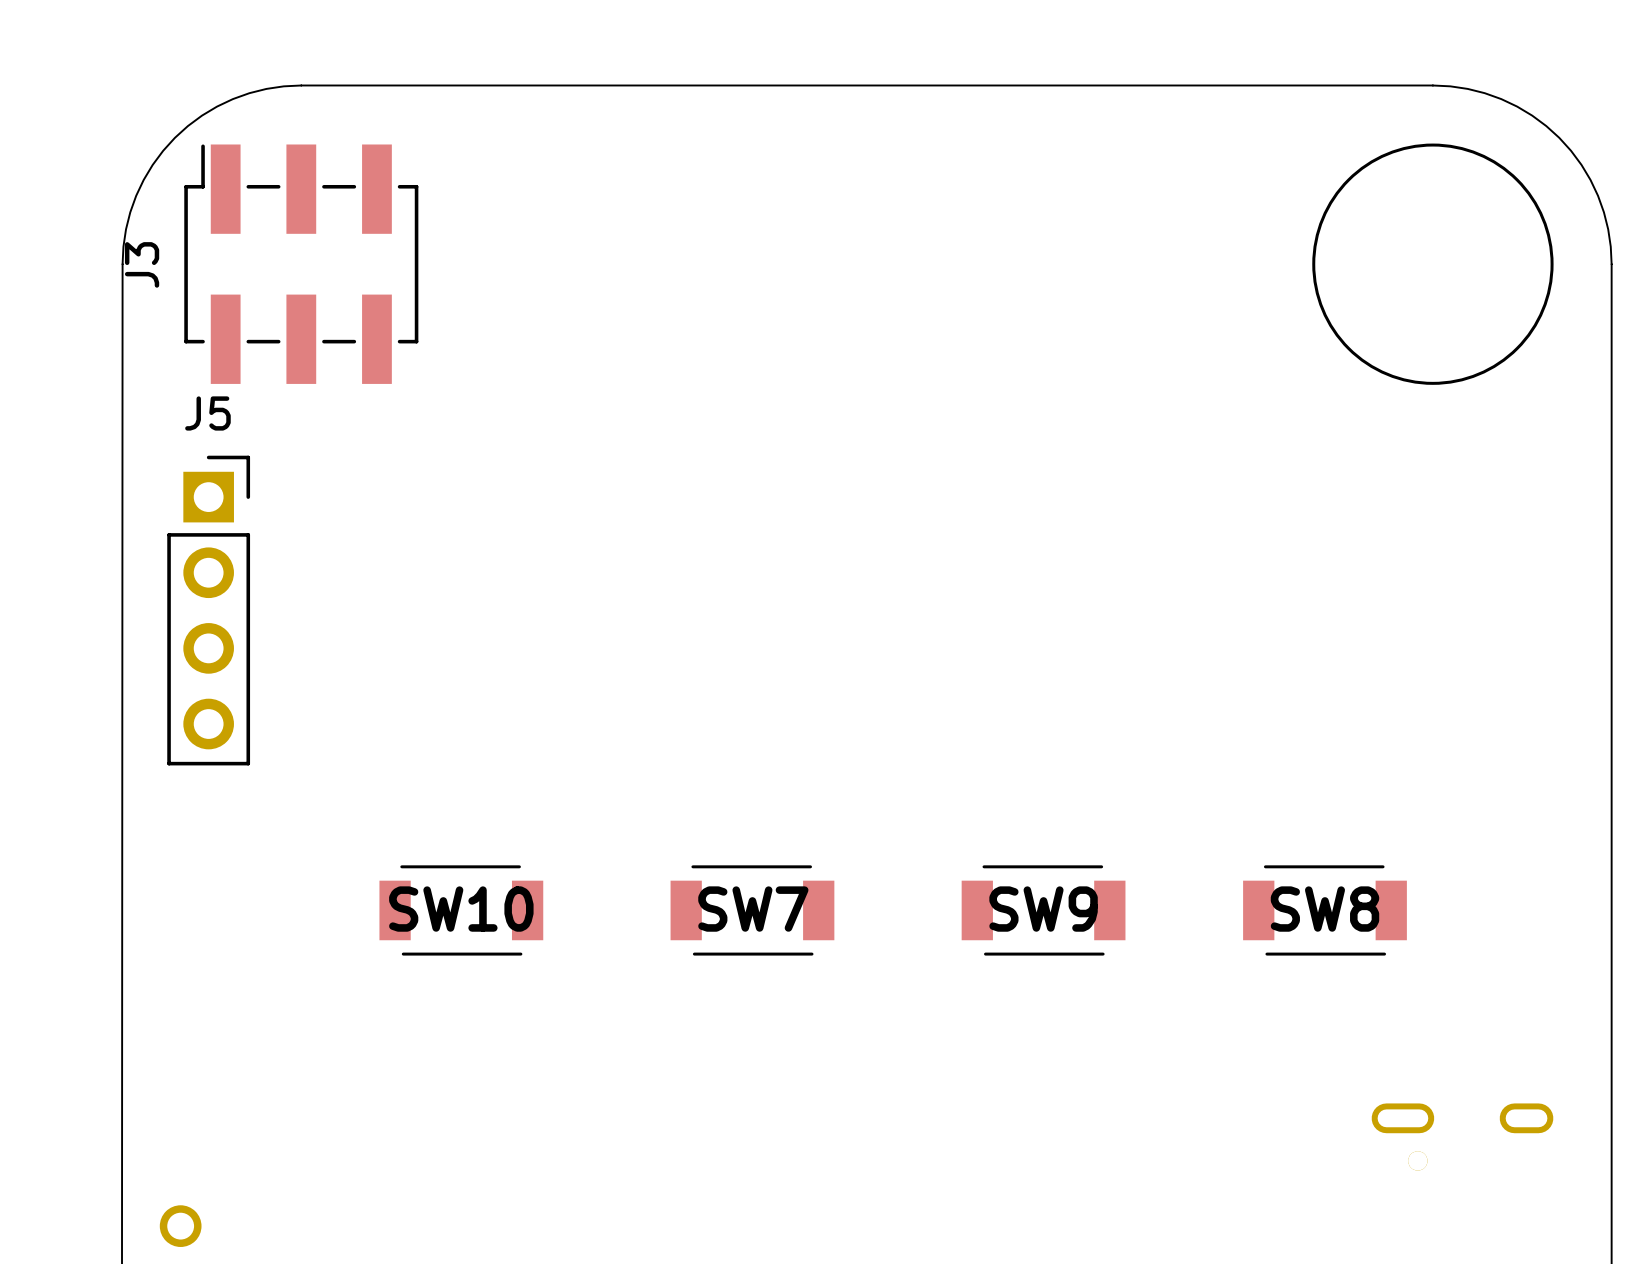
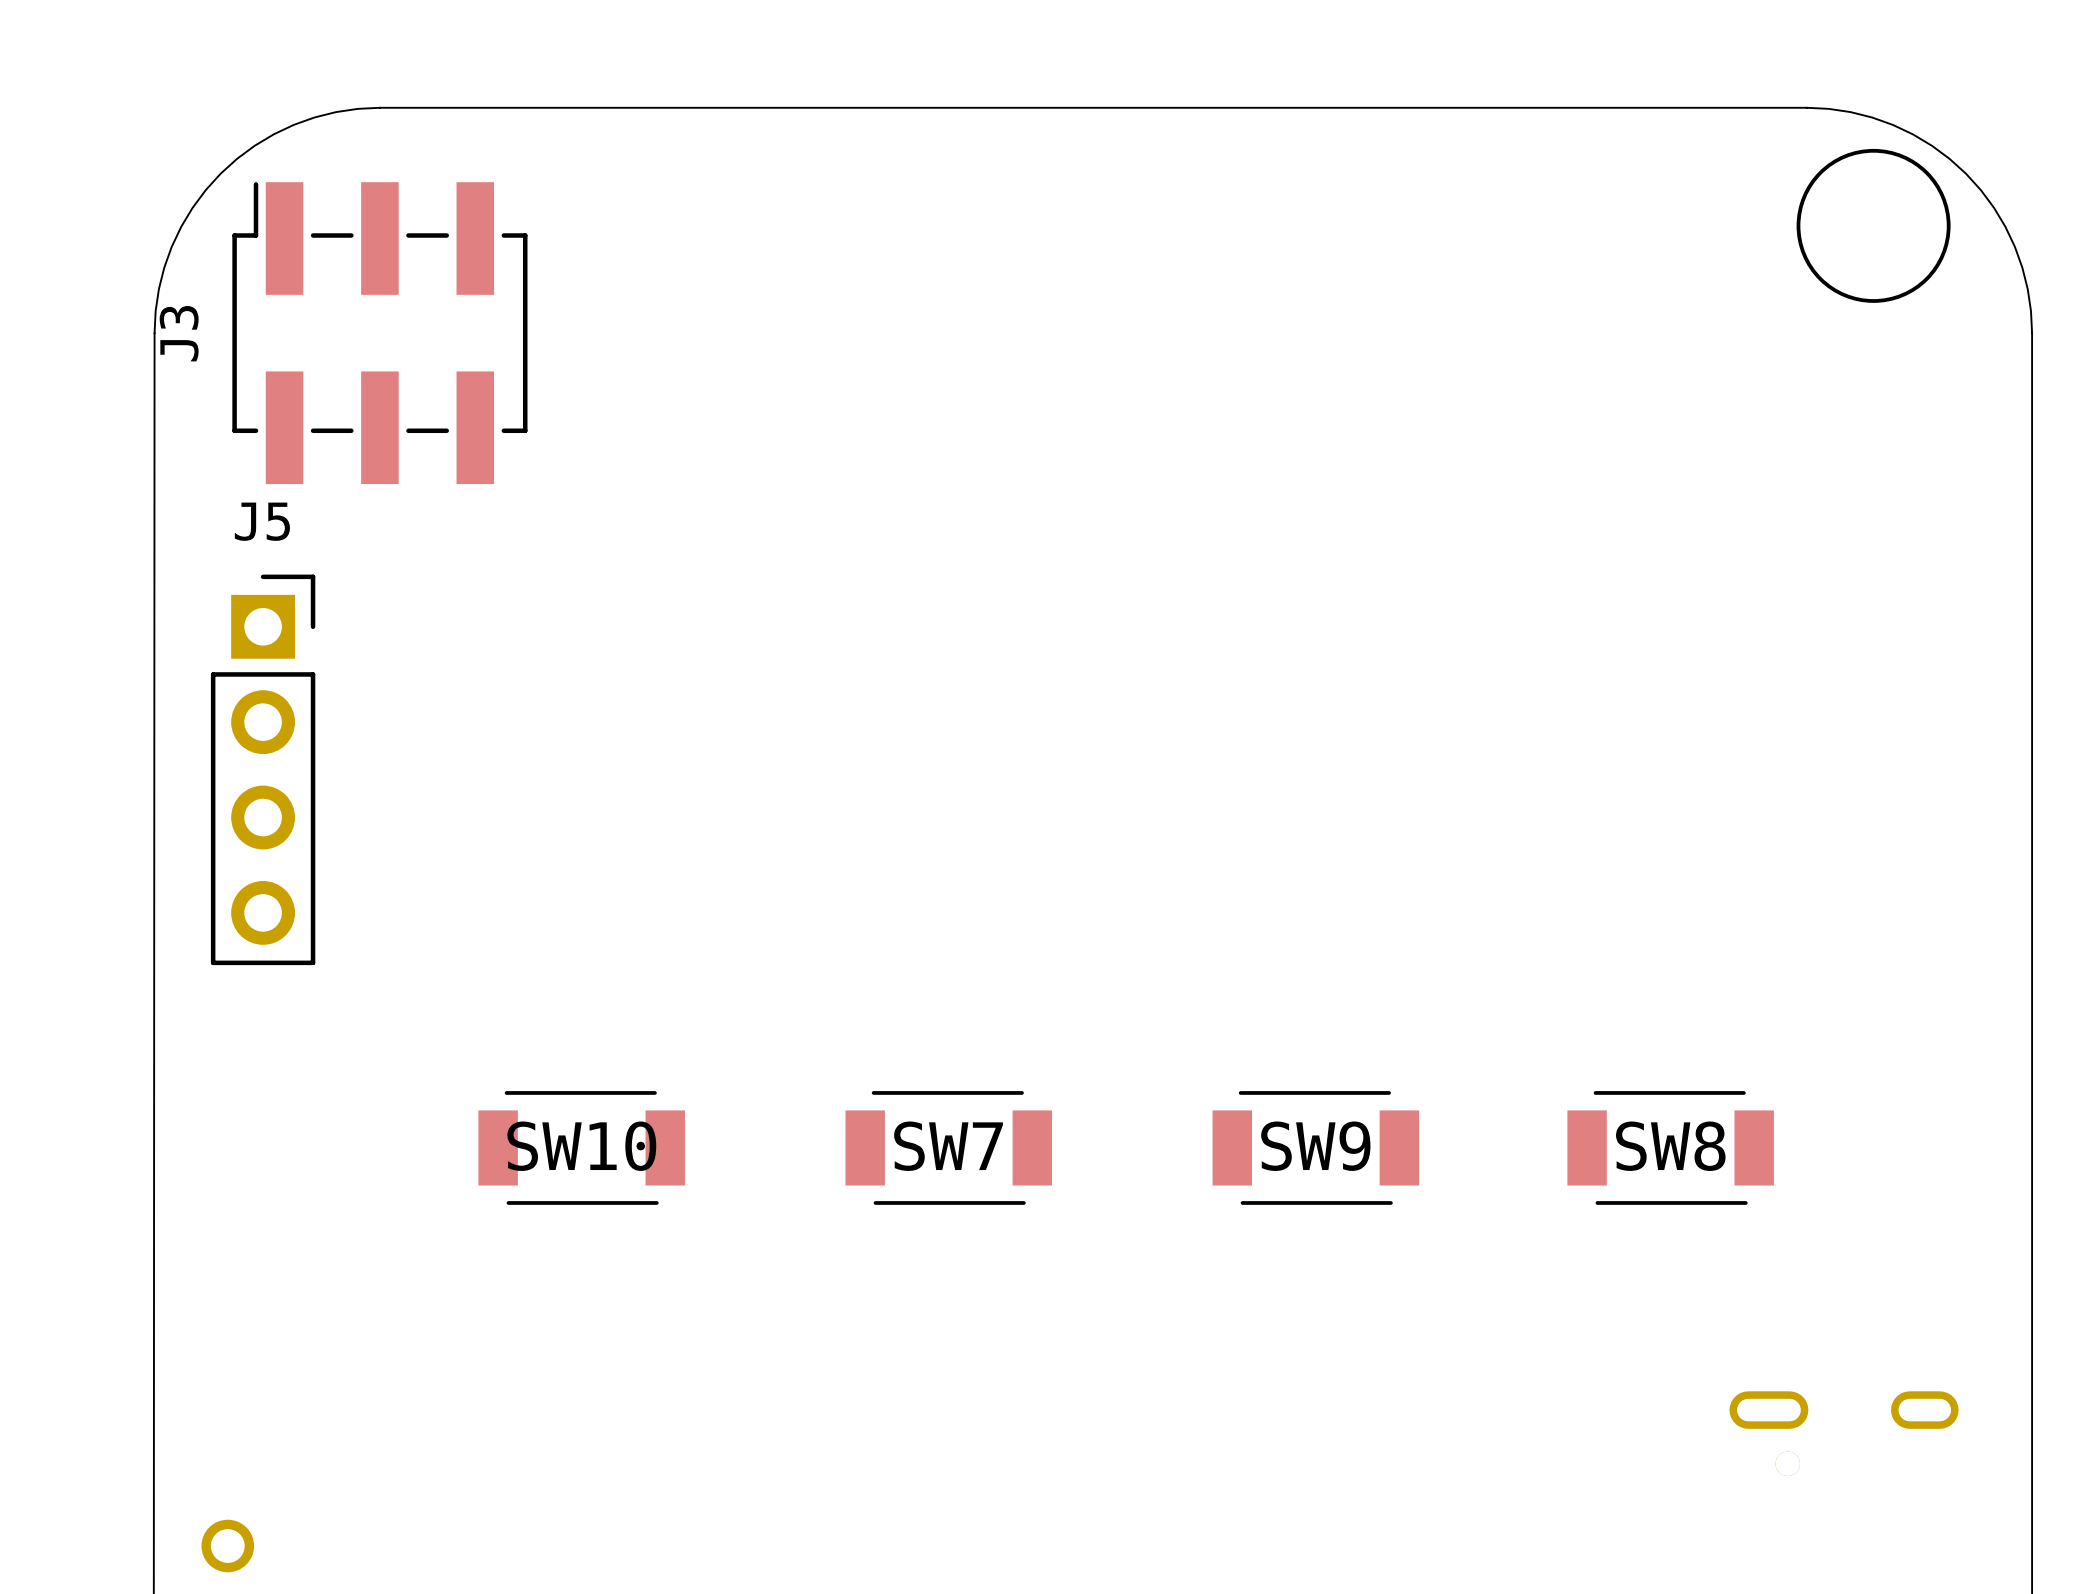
round board edge: none -> [1796, 148, 1951, 303]
round board edge: [1312, 143, 1554, 385] -> none

